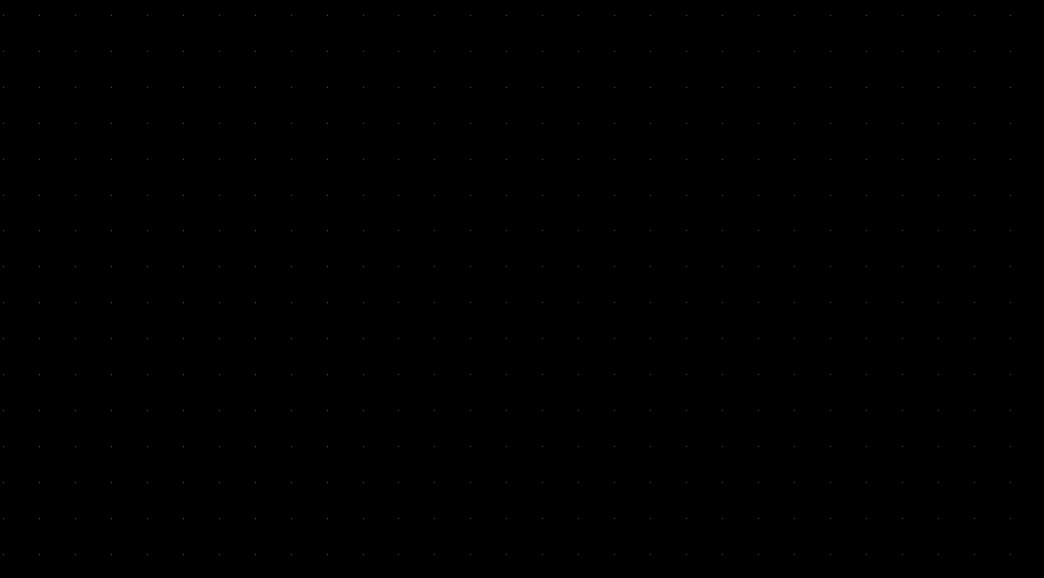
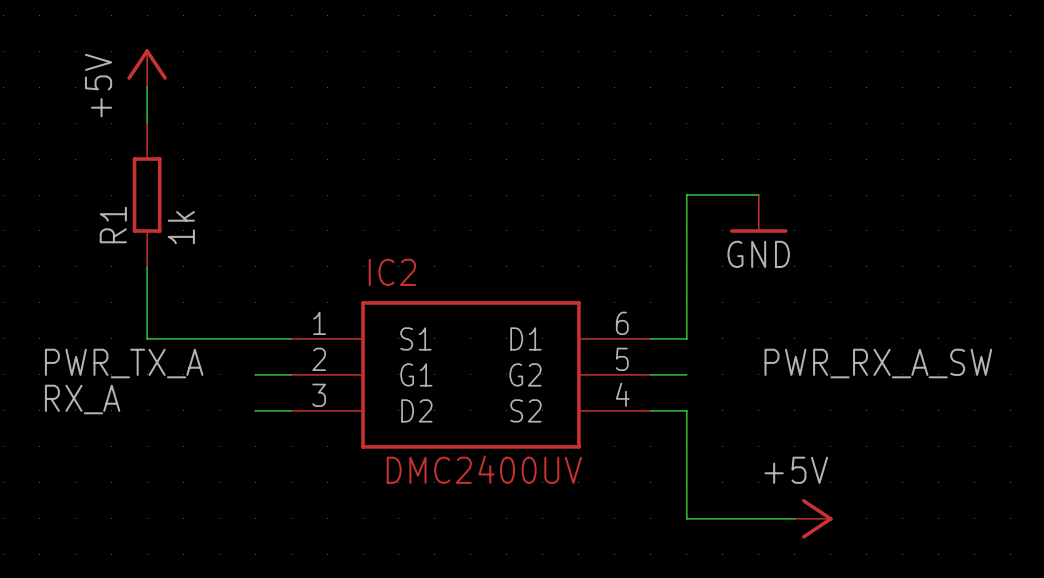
power symbol: none -> +5V (147, 68)
wire: none -> (147, 87) (147, 123)
R1: none -> 1k (147, 195)
wire: none -> (758, 195) (686, 195) (686, 338) (650, 338)
power symbol: none -> GND (758, 213)
wire: none -> (147, 266) (147, 338) (291, 338)
label: none -> PWR_TX_A (124, 363)
label: none -> PWR_RX_A_SW (878, 363)
wire: none -> (255, 374) (291, 374)
IC2: none -> (470, 374)
wire: none -> (650, 374) (686, 374)
label: none -> RX_A (82, 399)
wire: none -> (255, 410) (291, 410)
wire: none -> (650, 410) (686, 410) (686, 518) (794, 518)
power symbol: none -> +5V (813, 518)

